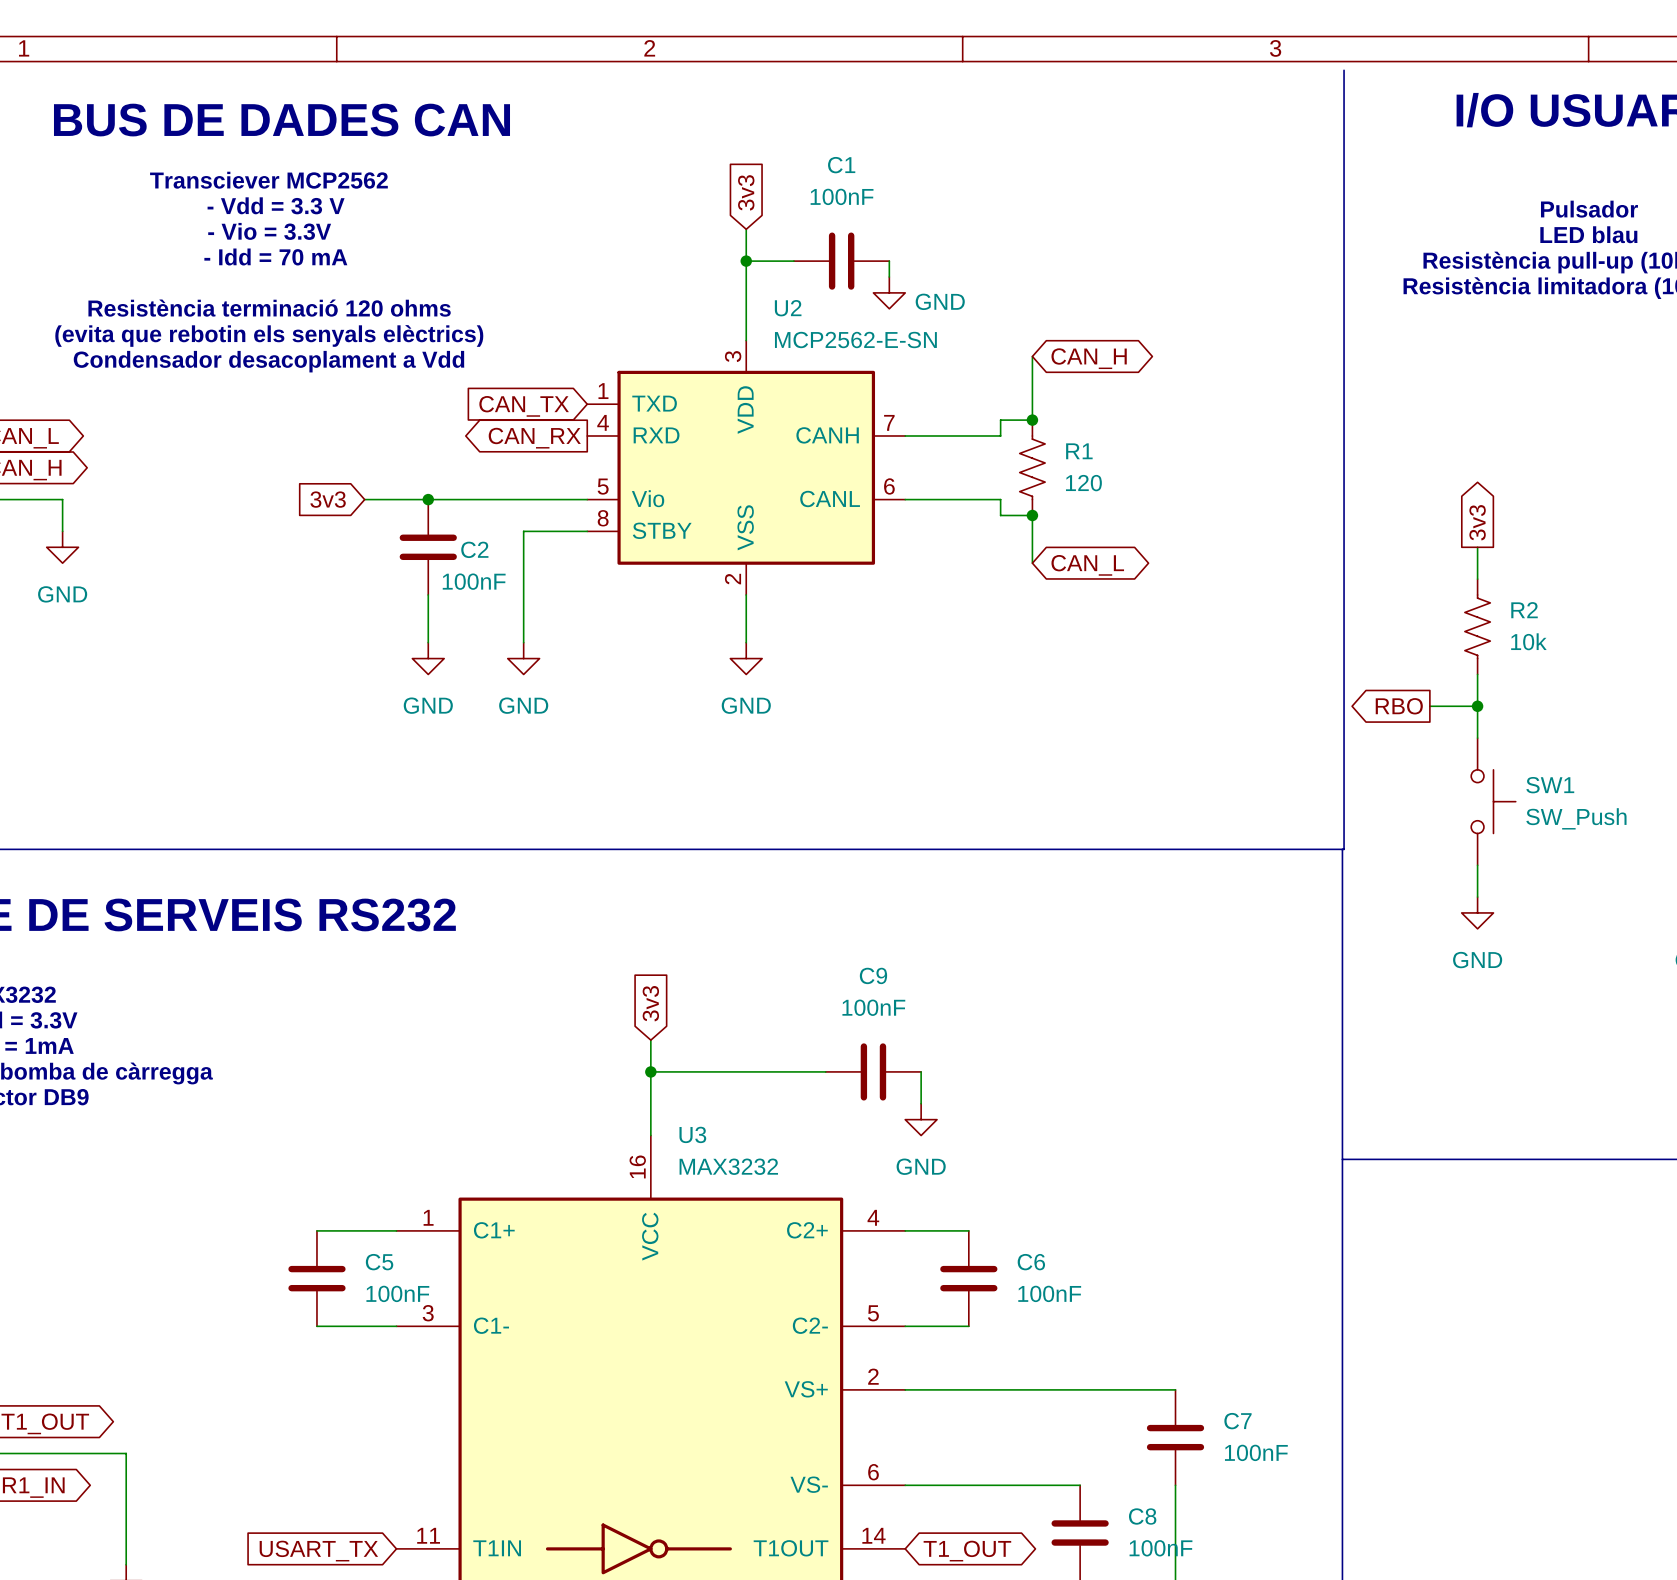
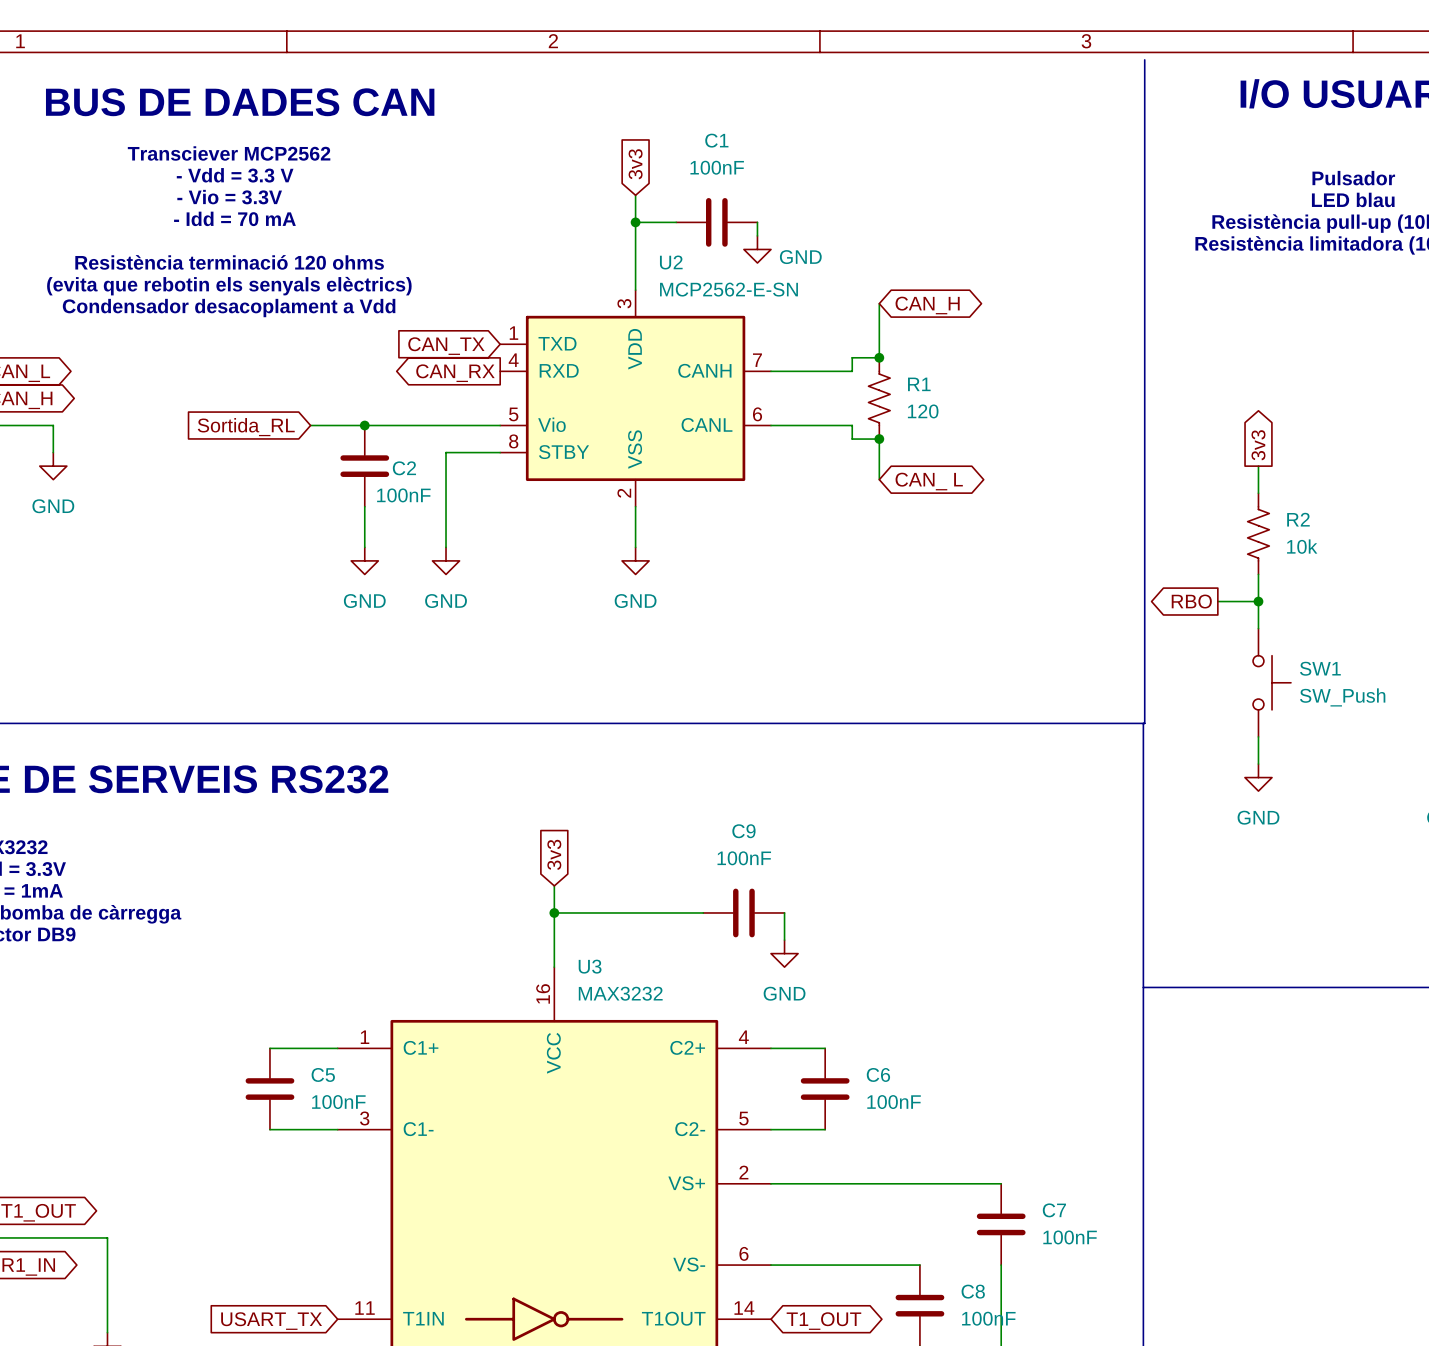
global label: 3v3 (328, 499) -> Sortida_RL (246, 427)
global label: CAN_L (1087, 565) -> CAN_ L (929, 481)

